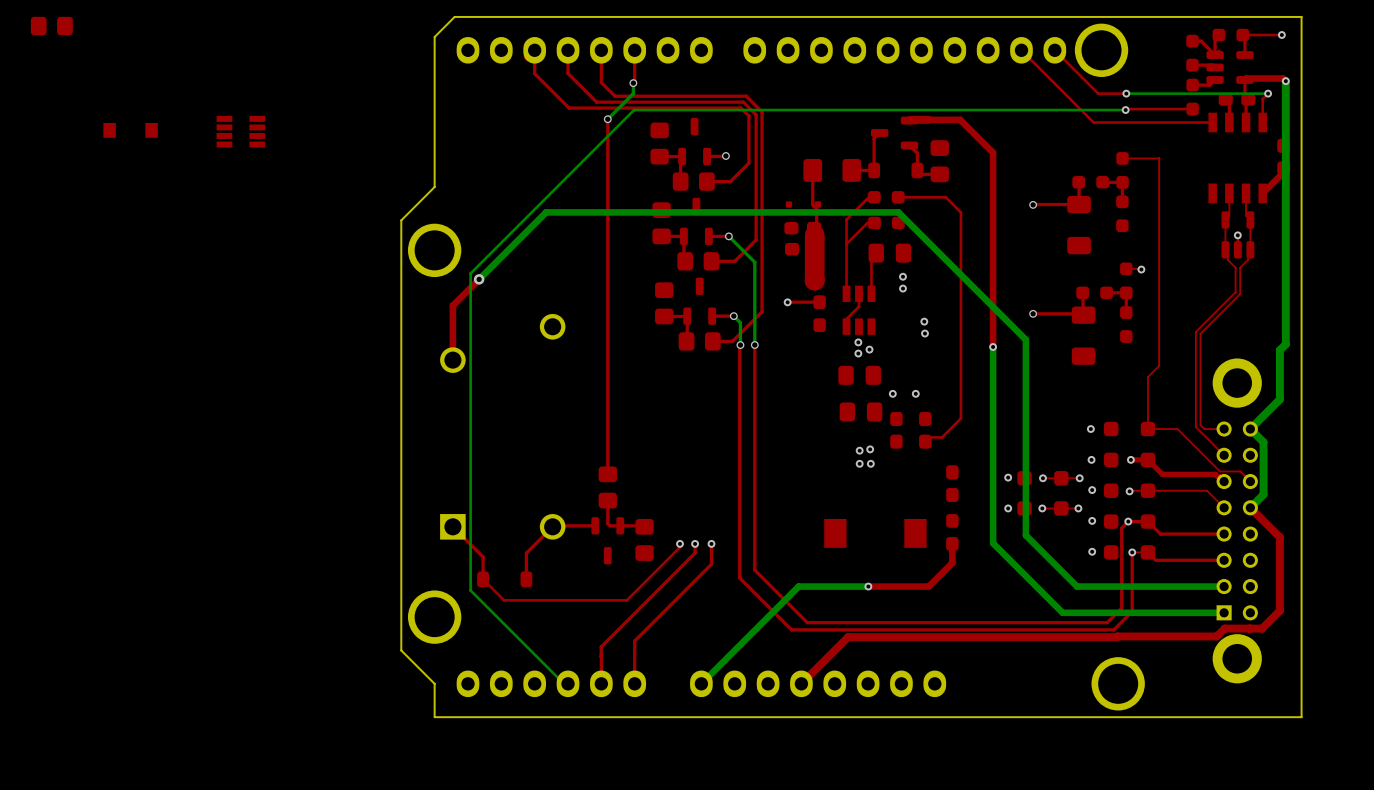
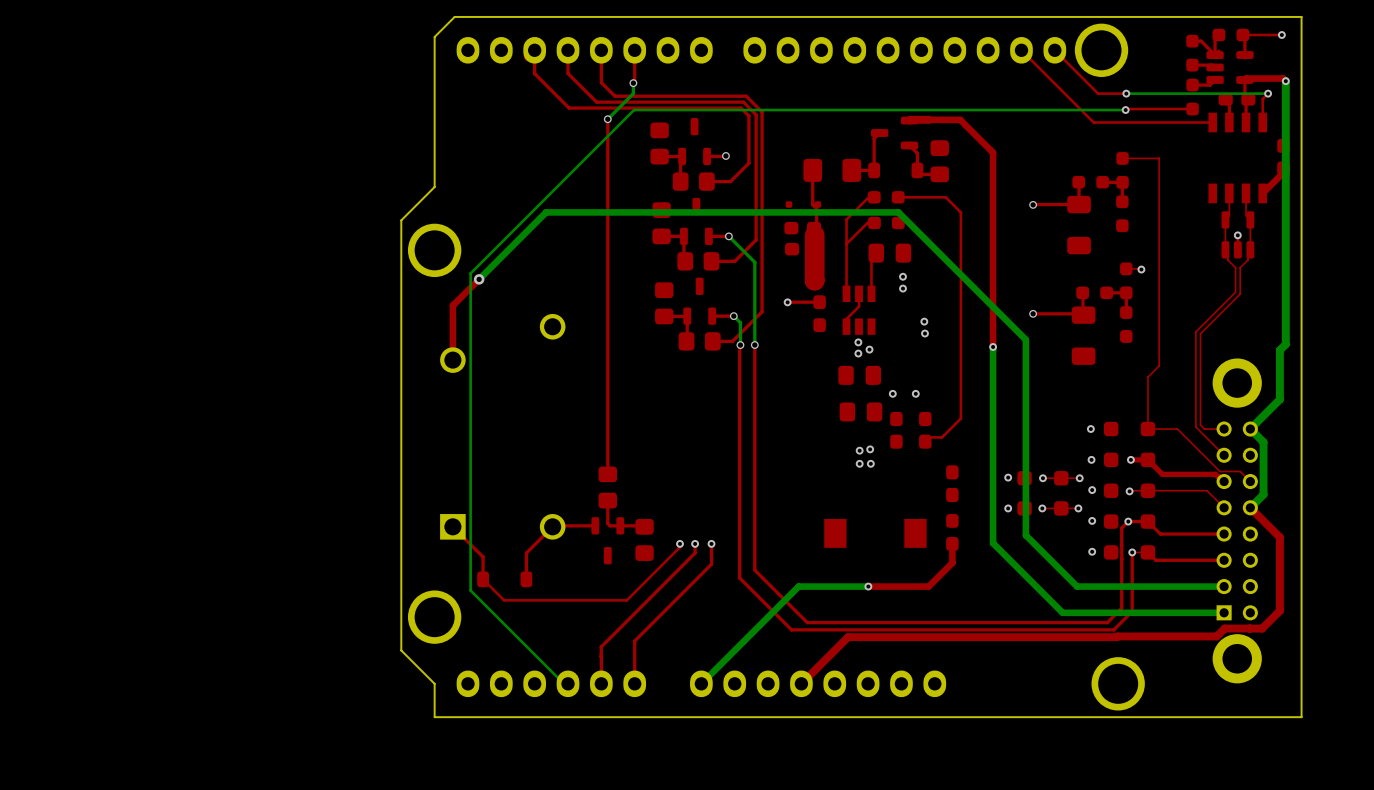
part: (51, 26) -> none
part: (130, 130) -> none
part: (240, 131) -> none

